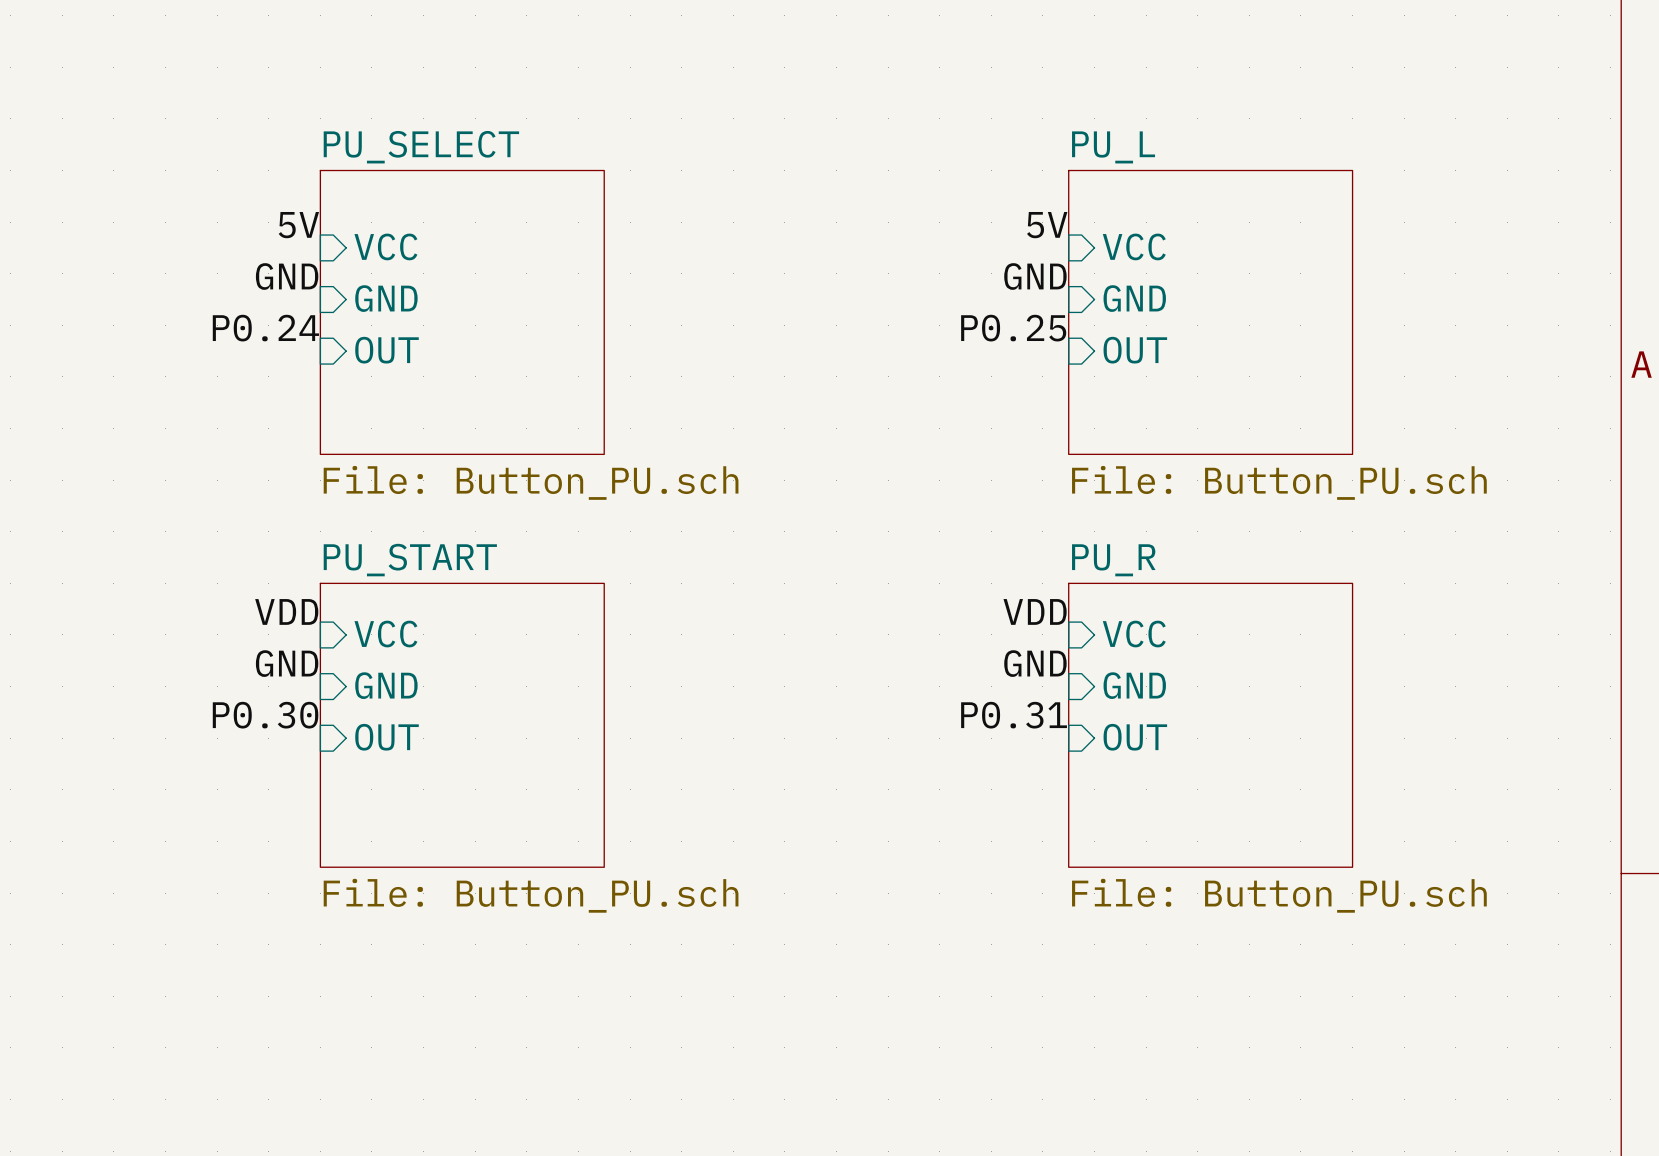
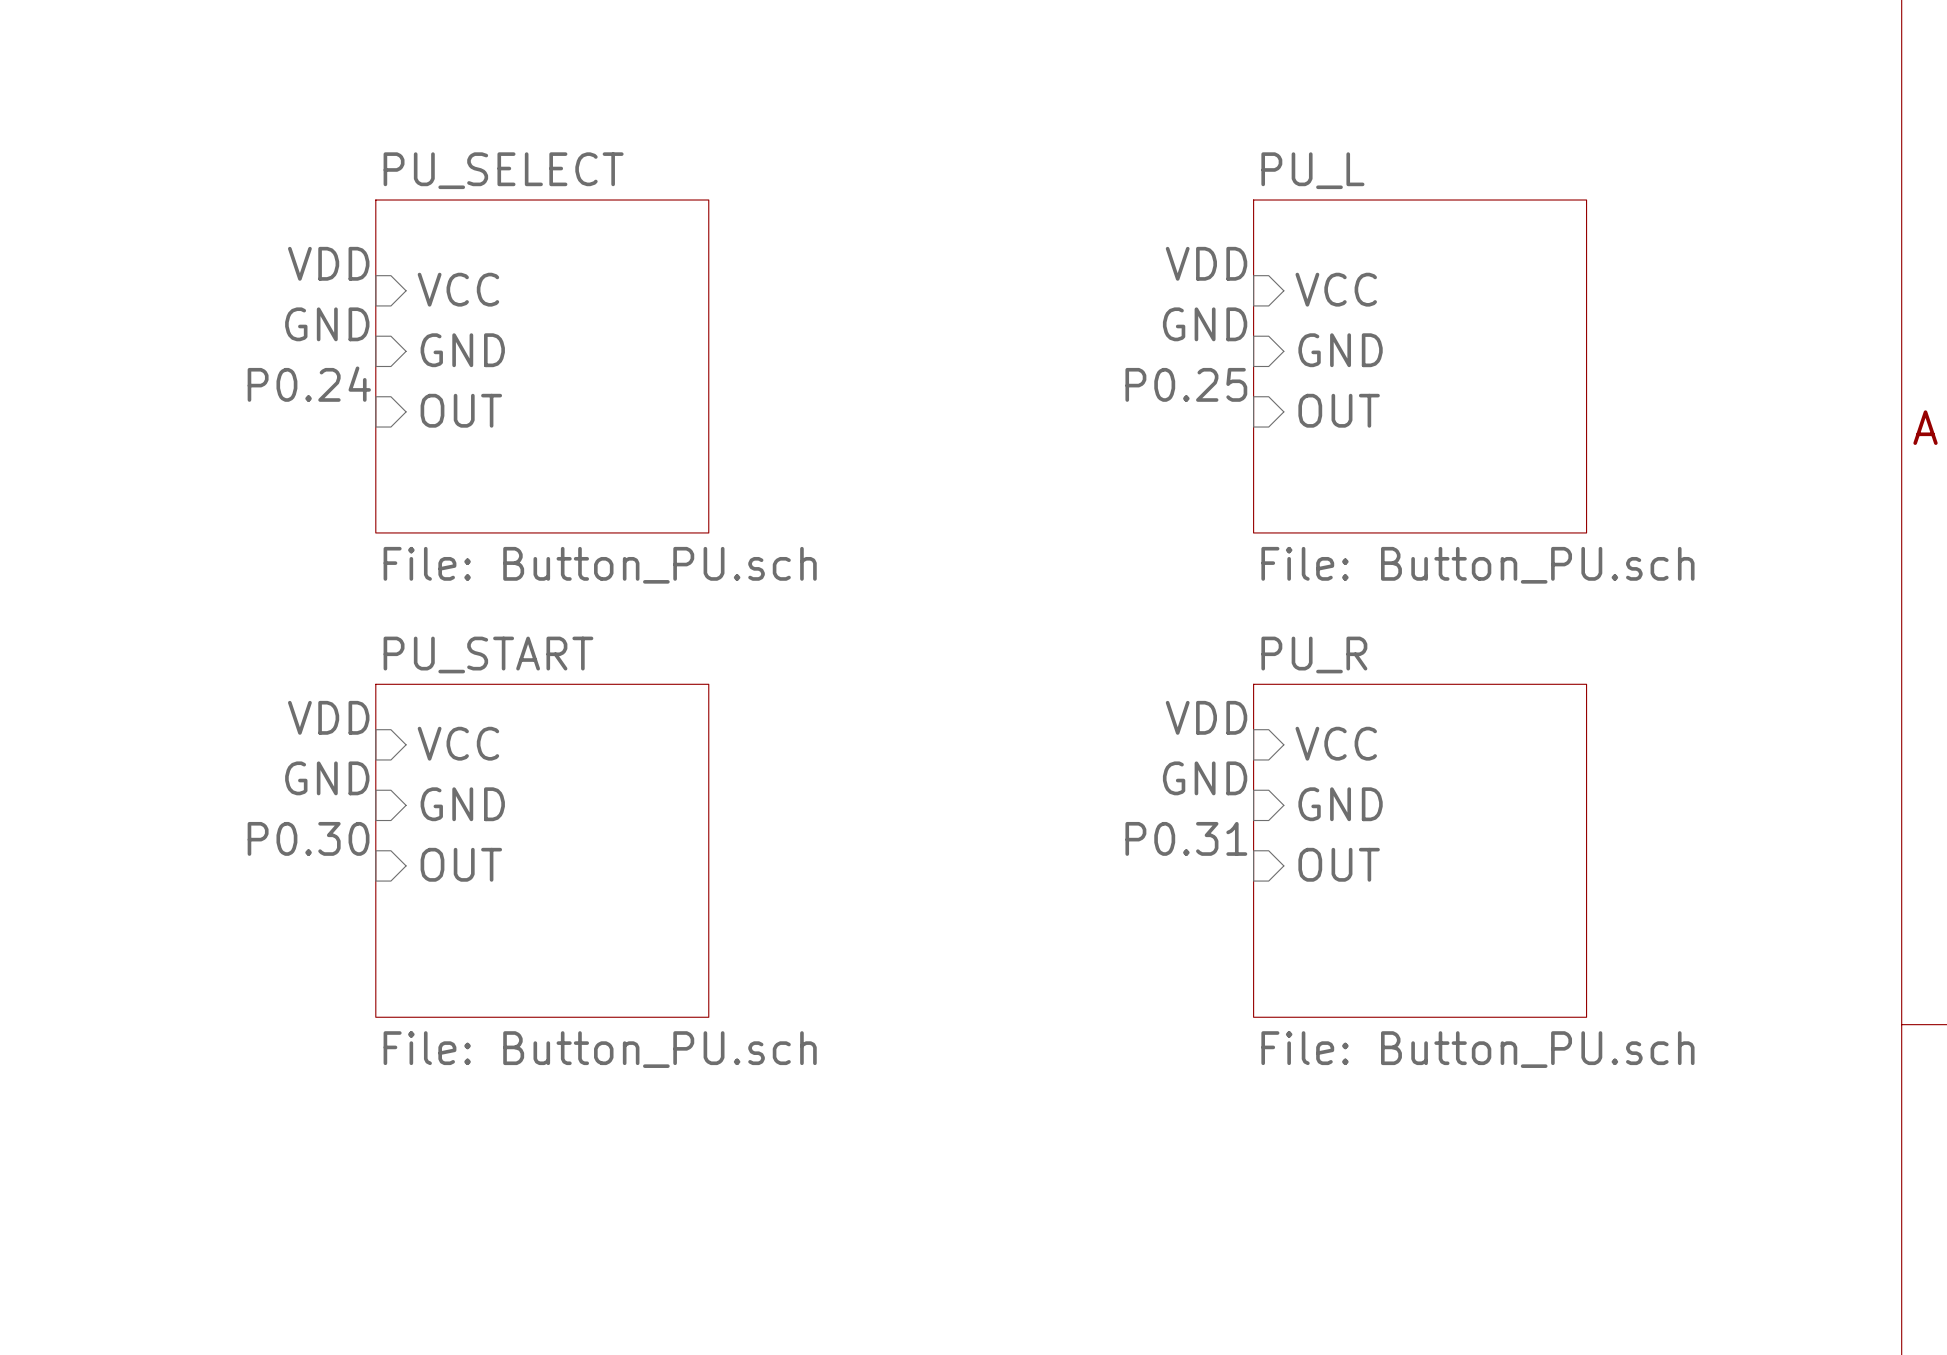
label: 5V (298, 225) -> VDD (328, 263)
label: 5V (1047, 225) -> VDD (1206, 263)

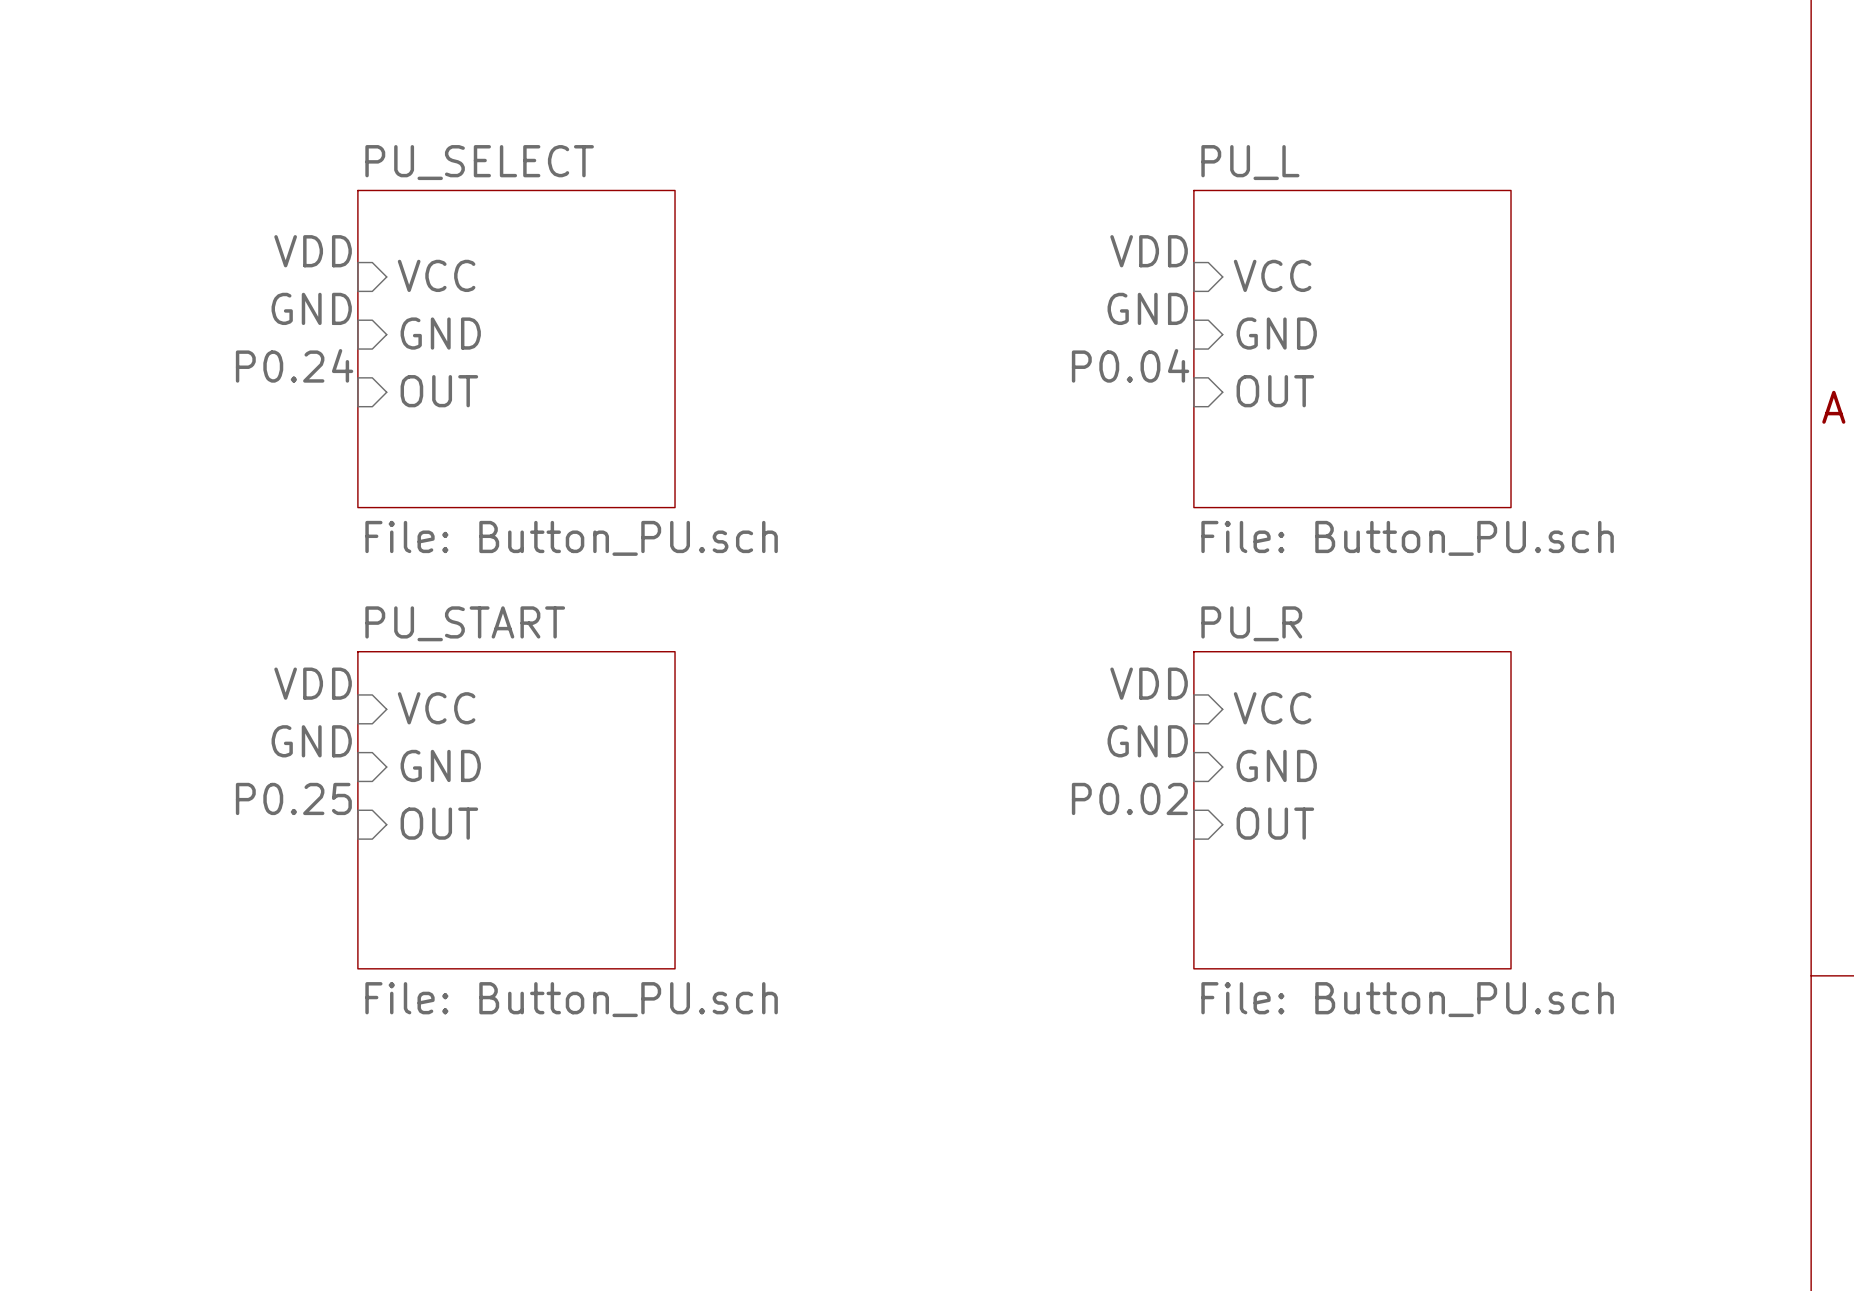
label: P0.25 (1186, 384) -> P0.04 (1130, 365)
label: P0.30 (308, 838) -> P0.25 (293, 798)
label: P0.31 (1186, 838) -> P0.02 (1129, 798)

